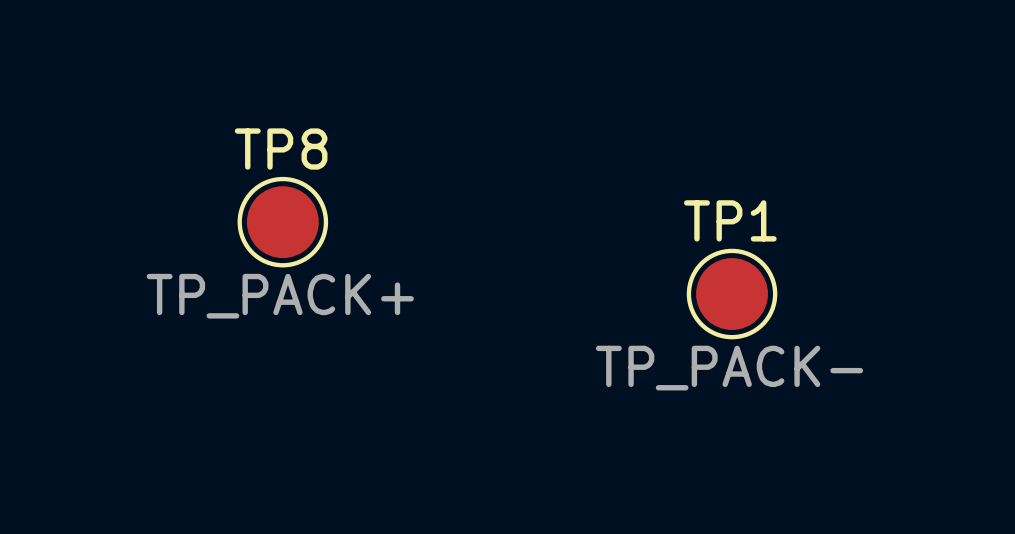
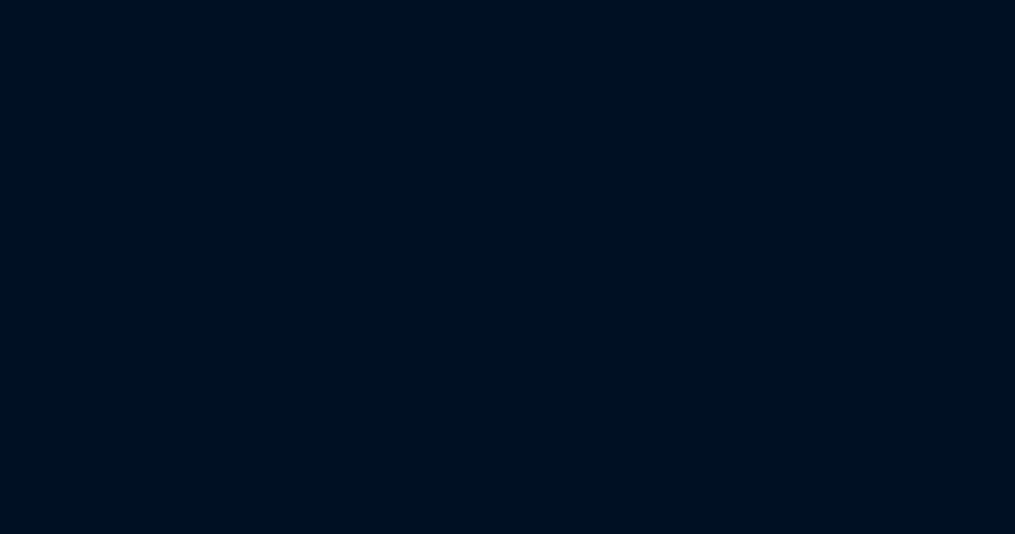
TP8: TP_PACK+ (282, 222) -> none
TP1: TP_PACK- (732, 294) -> none

